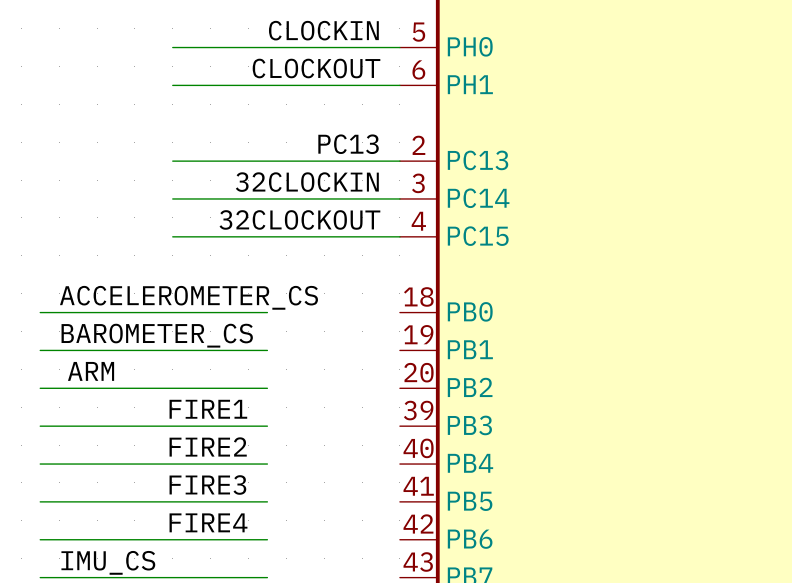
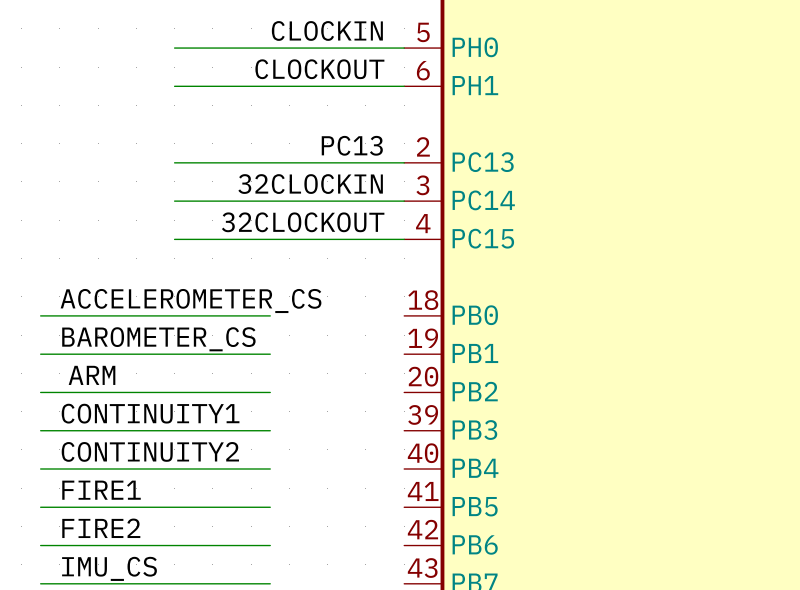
label: none -> CONTINUITY1 (150, 413)
label position: FIRE1 (208, 409) -> FIRE1 (101, 490)
label position: FIRE2 (208, 446) -> FIRE2 (101, 528)
label: none -> CONTINUITY2 (150, 451)
label: FIRE3 (207, 484) -> none
label: FIRE4 (208, 522) -> none

